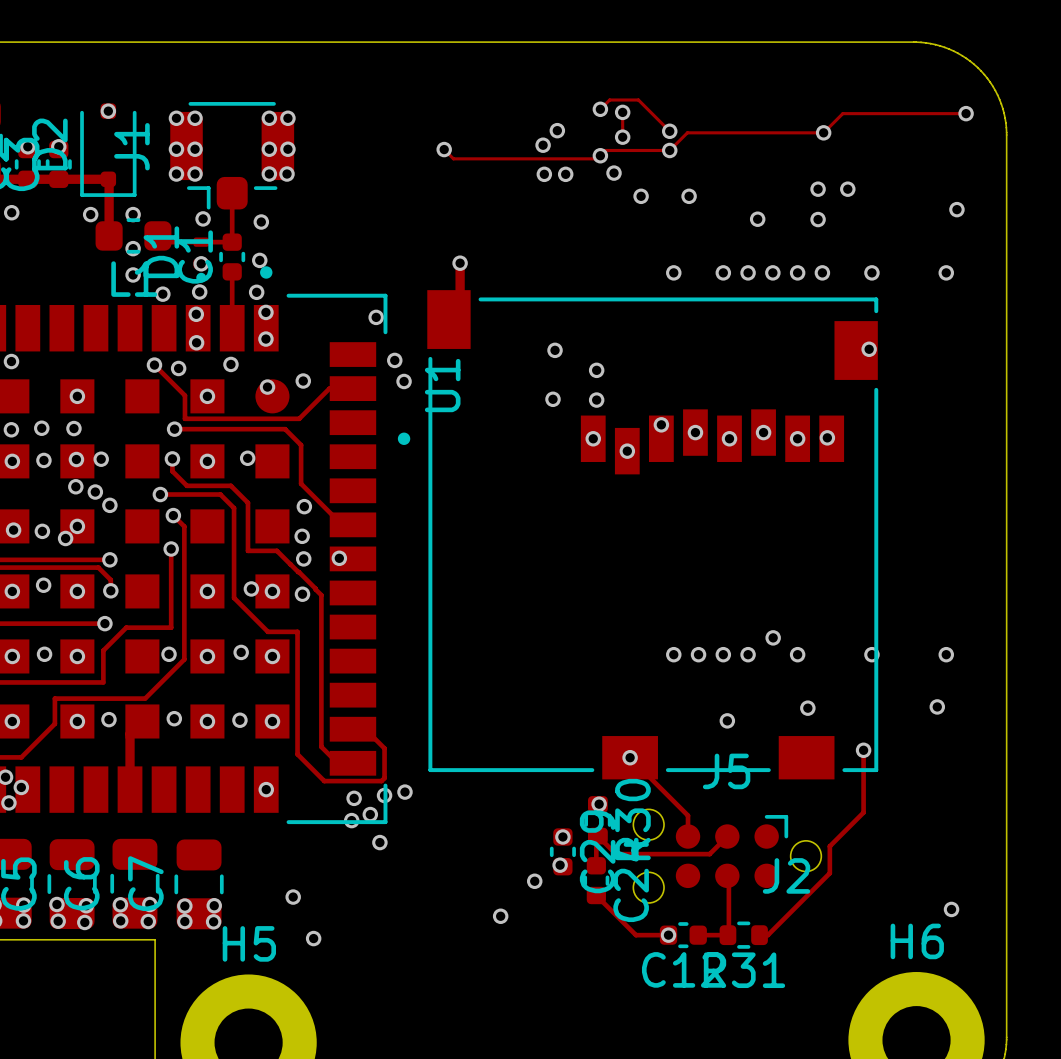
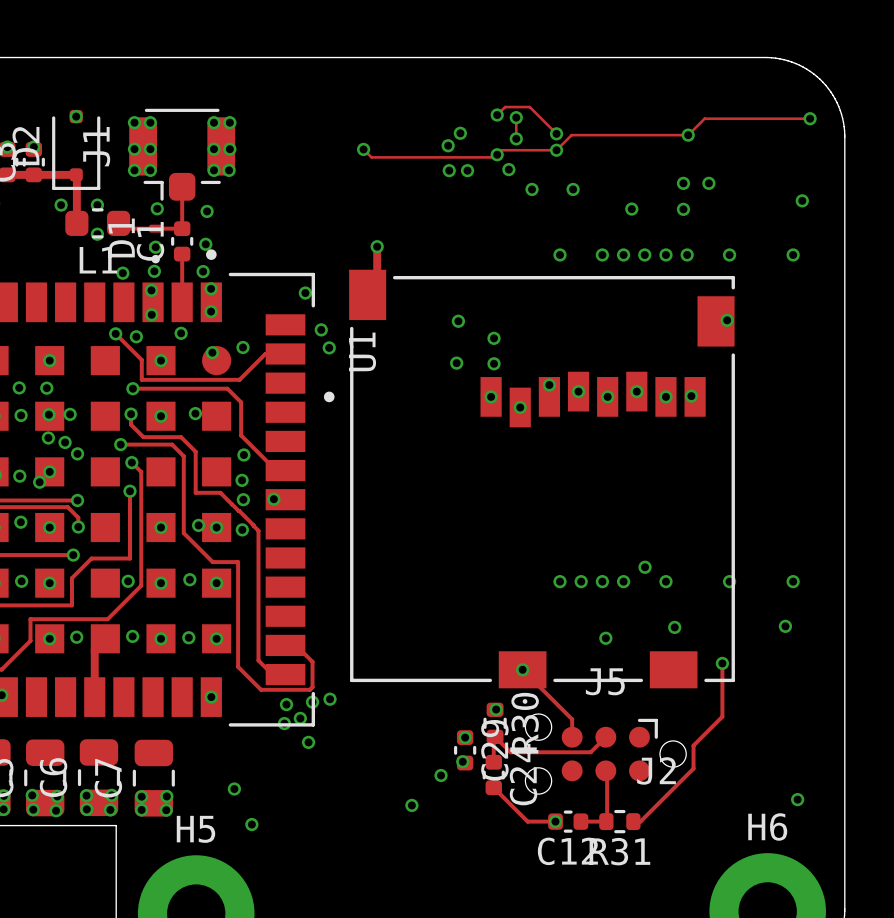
via: (133, 274) -> none

